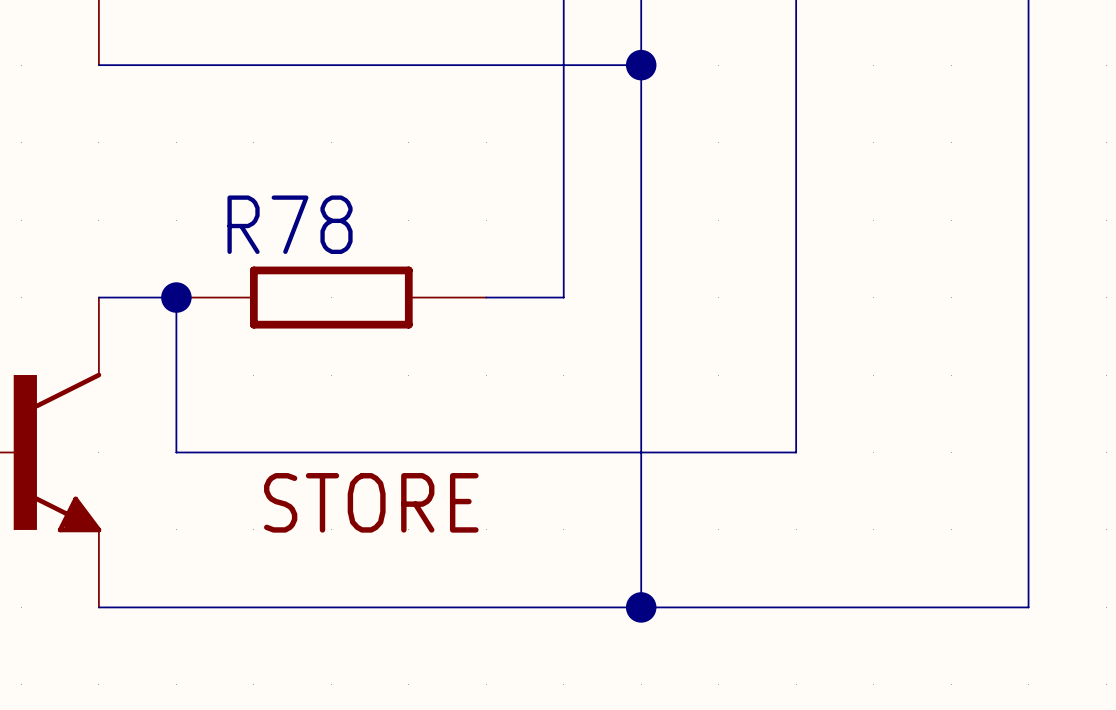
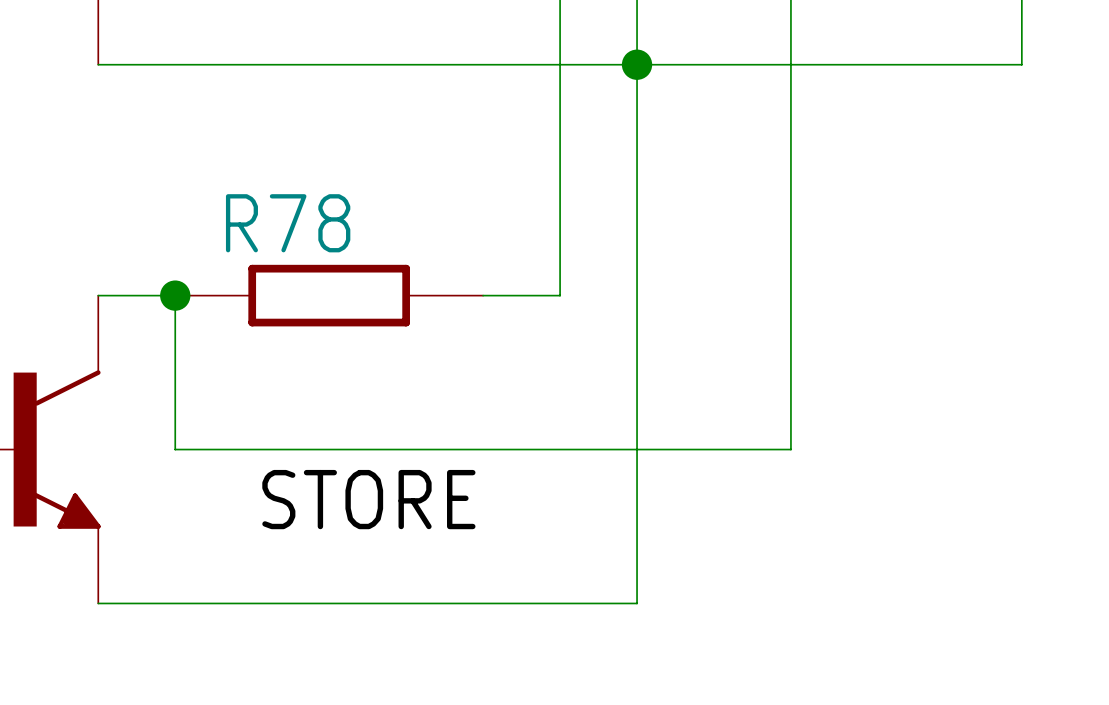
wire: (1028, 65) (1028, 607) (641, 607) -> (1021, 64) (637, 64)
junction: (641, 607) -> none

